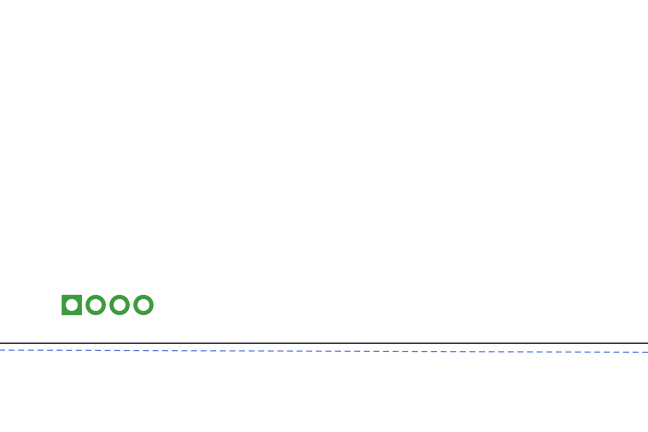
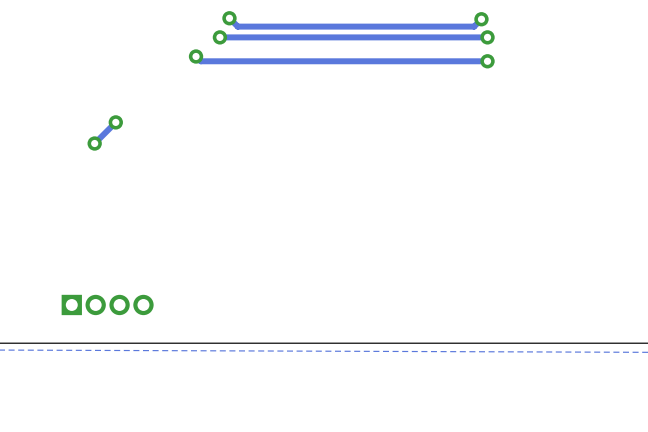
track: none -> (229, 18) (237, 26) (474, 26) (481, 19)
via: none -> (229, 18)
via: none -> (481, 19)
via: none -> (219, 37)
track: none -> (487, 37) (219, 37)
via: none -> (487, 37)
track: none -> (196, 56) (200, 61) (487, 61)
via: none -> (196, 56)
via: none -> (487, 61)
track: none -> (115, 122) (94, 143)
via: none -> (115, 122)
via: none -> (94, 143)

